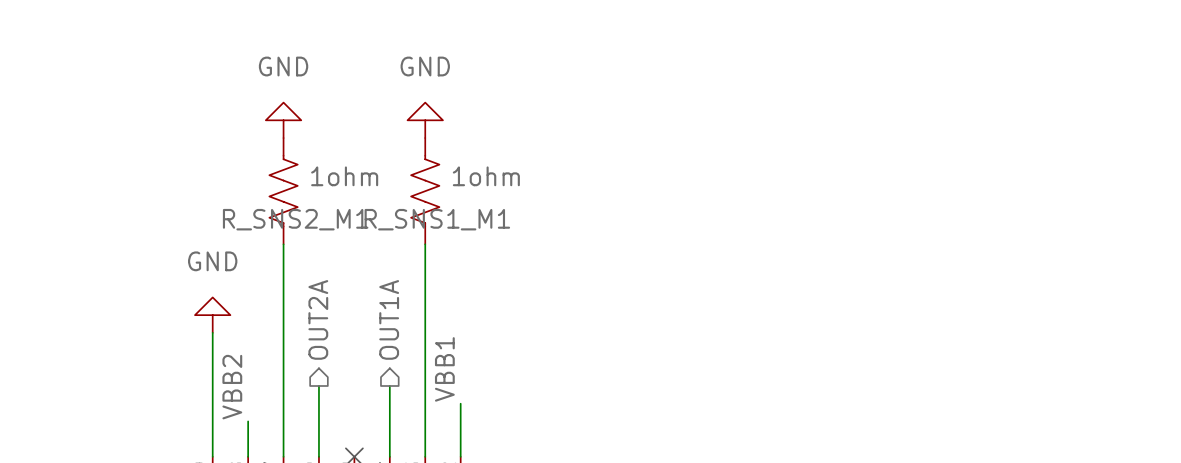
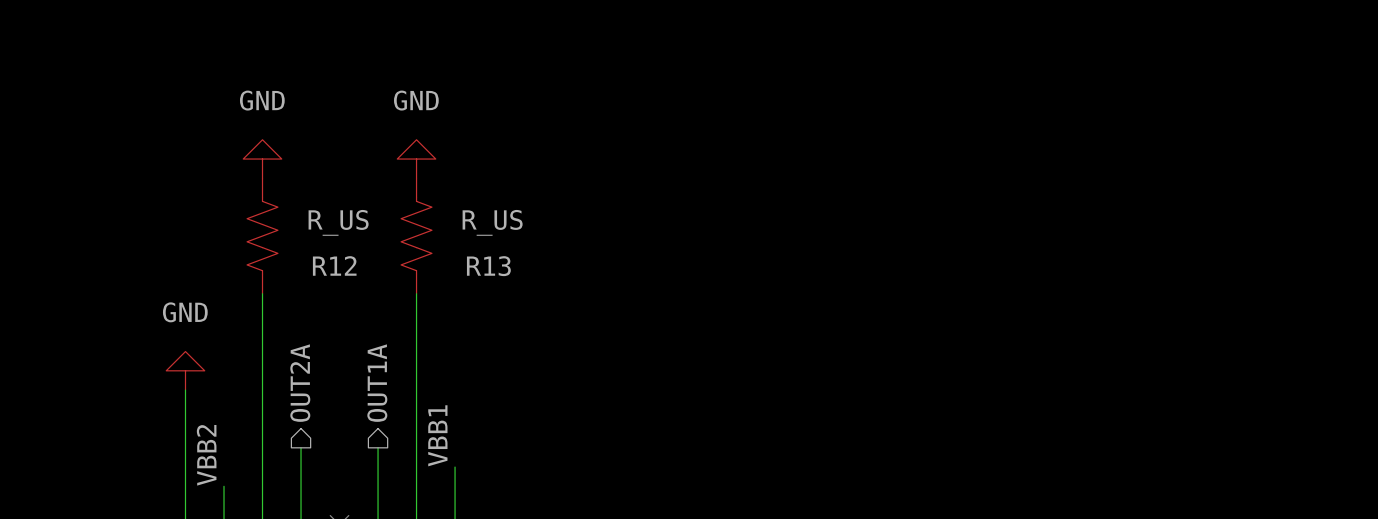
R_SNS2_M1 value: 1ohm (344, 176) -> R_US (338, 222)
R_SNS1_M1 value: 1ohm (486, 176) -> R_US (492, 222)
R_SNS2_M1 name: R_SNS2_M1 (295, 219) -> R12 (334, 265)
R_SNS1_M1 name: R_SNS1_M1 (437, 219) -> R13 (488, 266)

